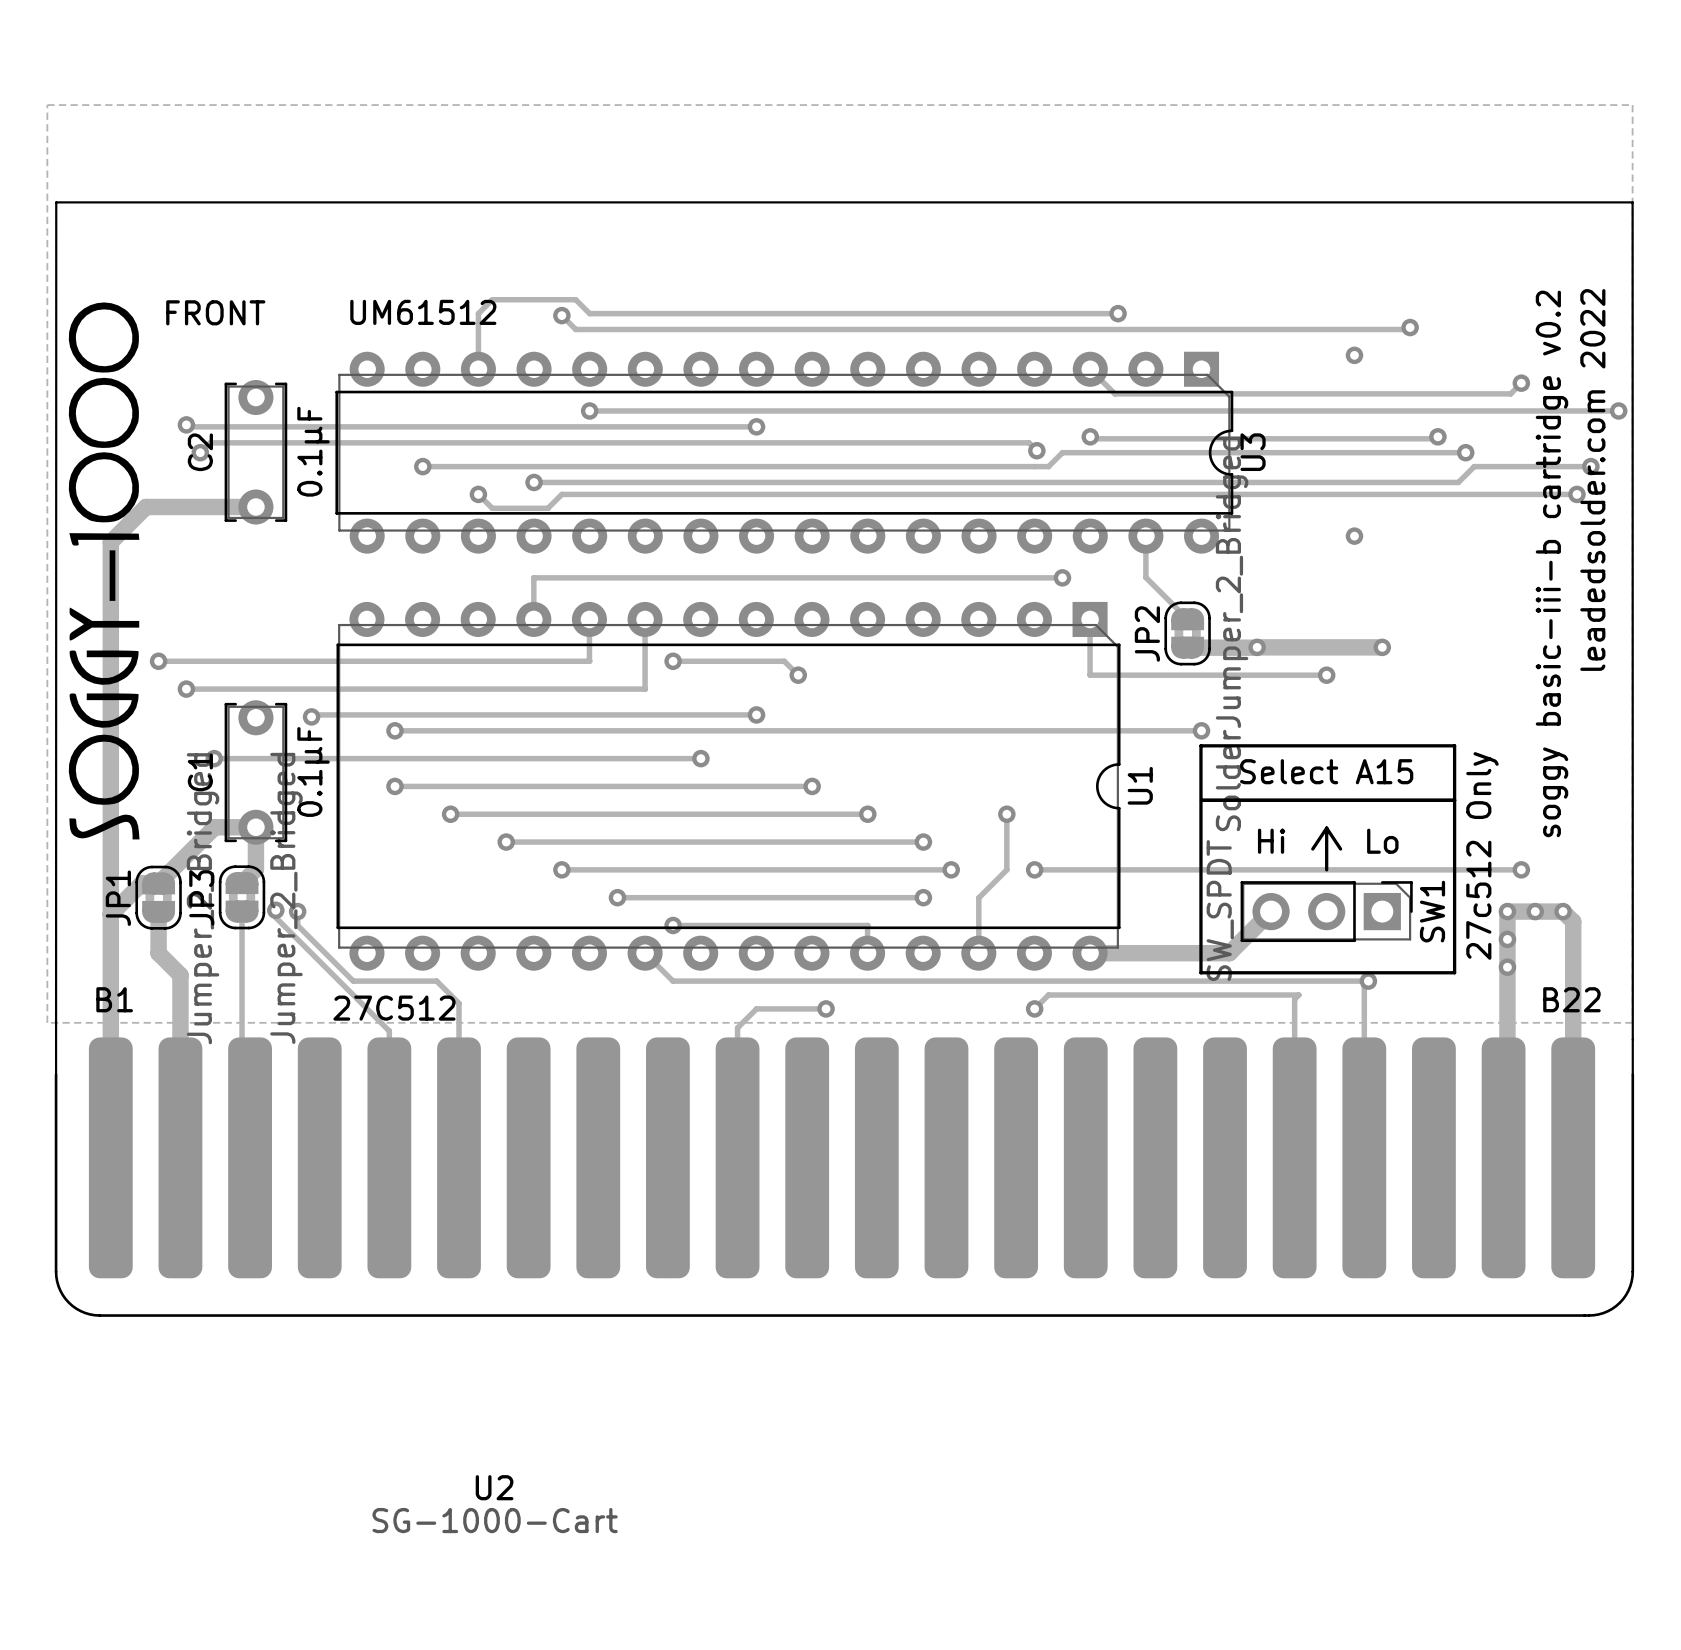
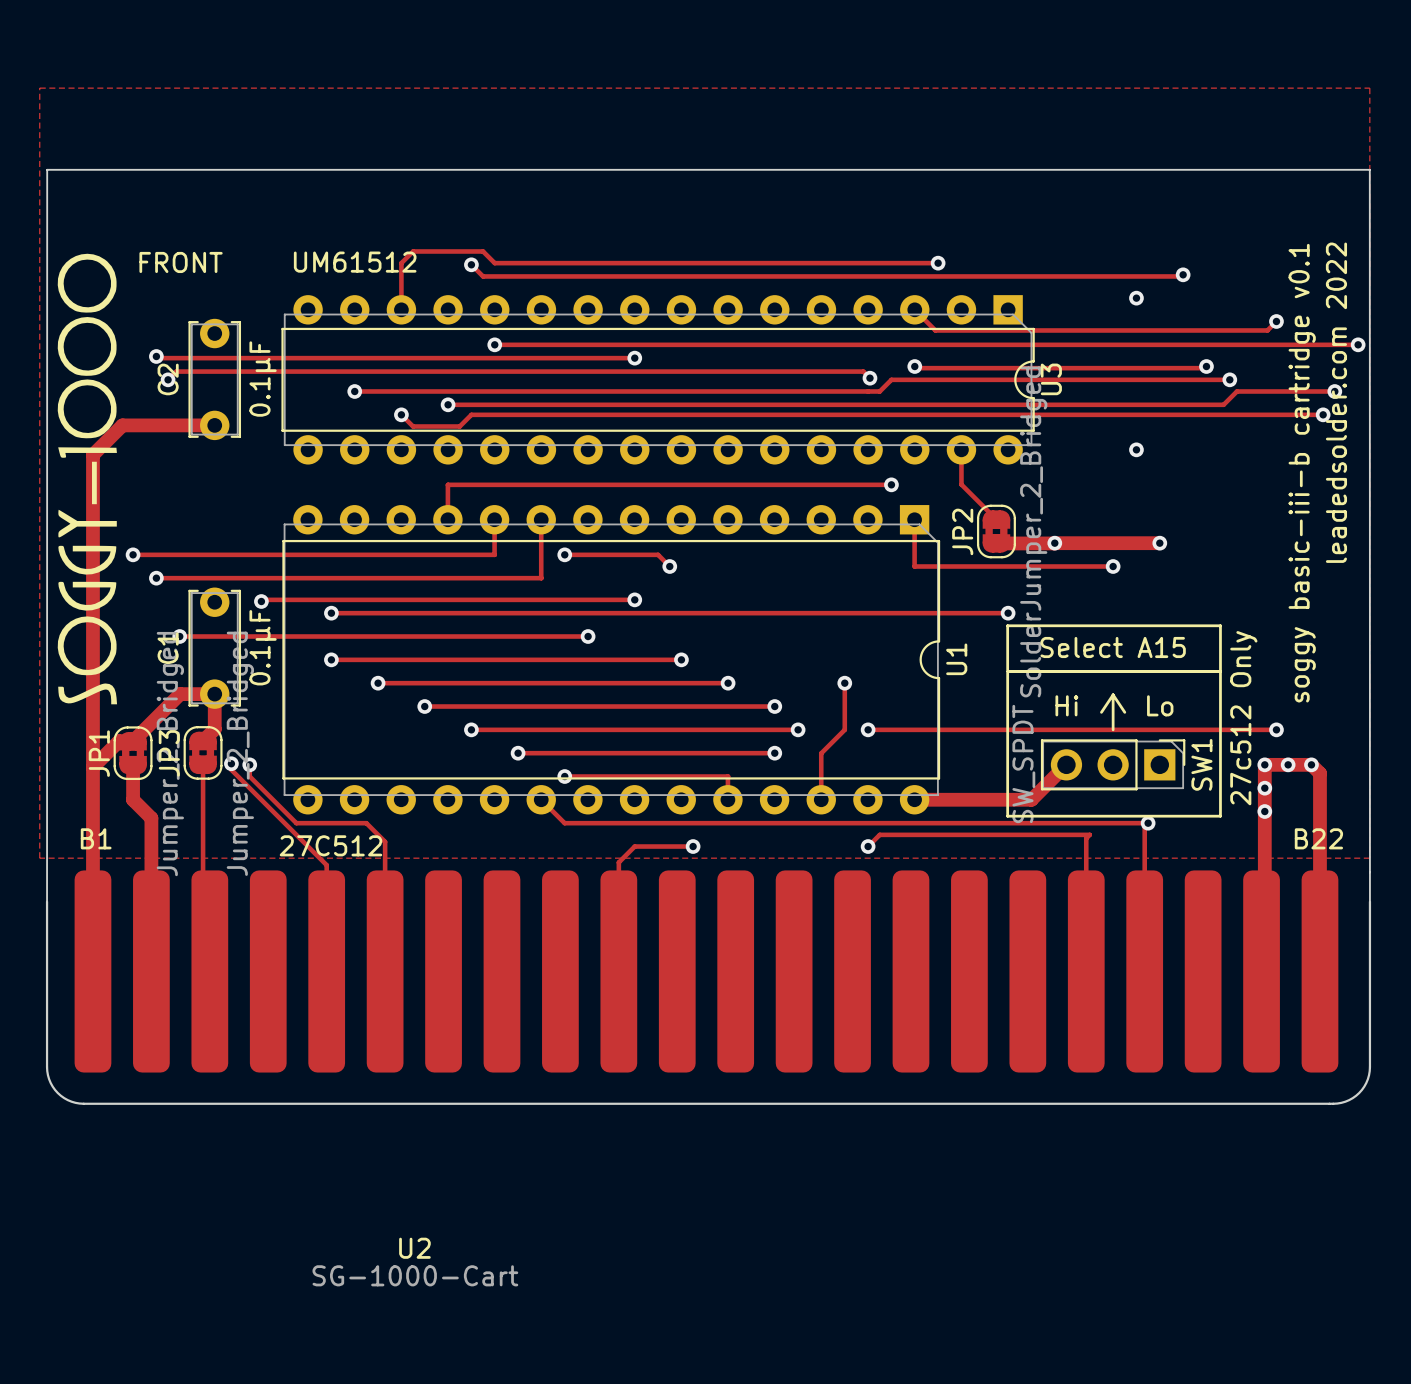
text: soggy basic-iii-b cartridge v0.2 (1552, 563) -> soggy basic-iii-b cartridge v0.1 (1302, 473)

